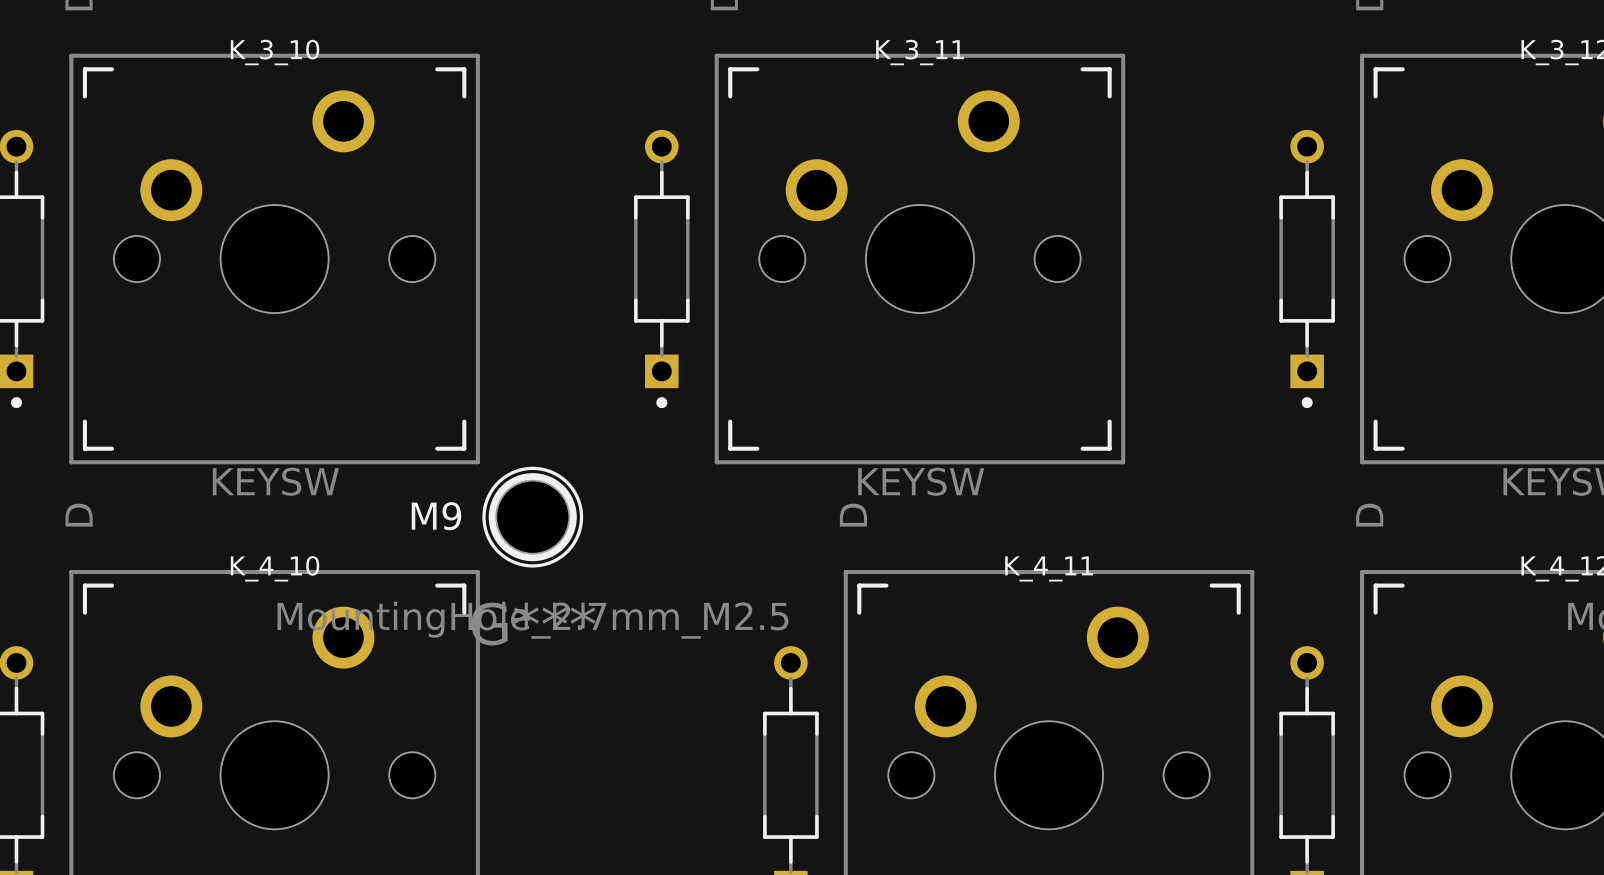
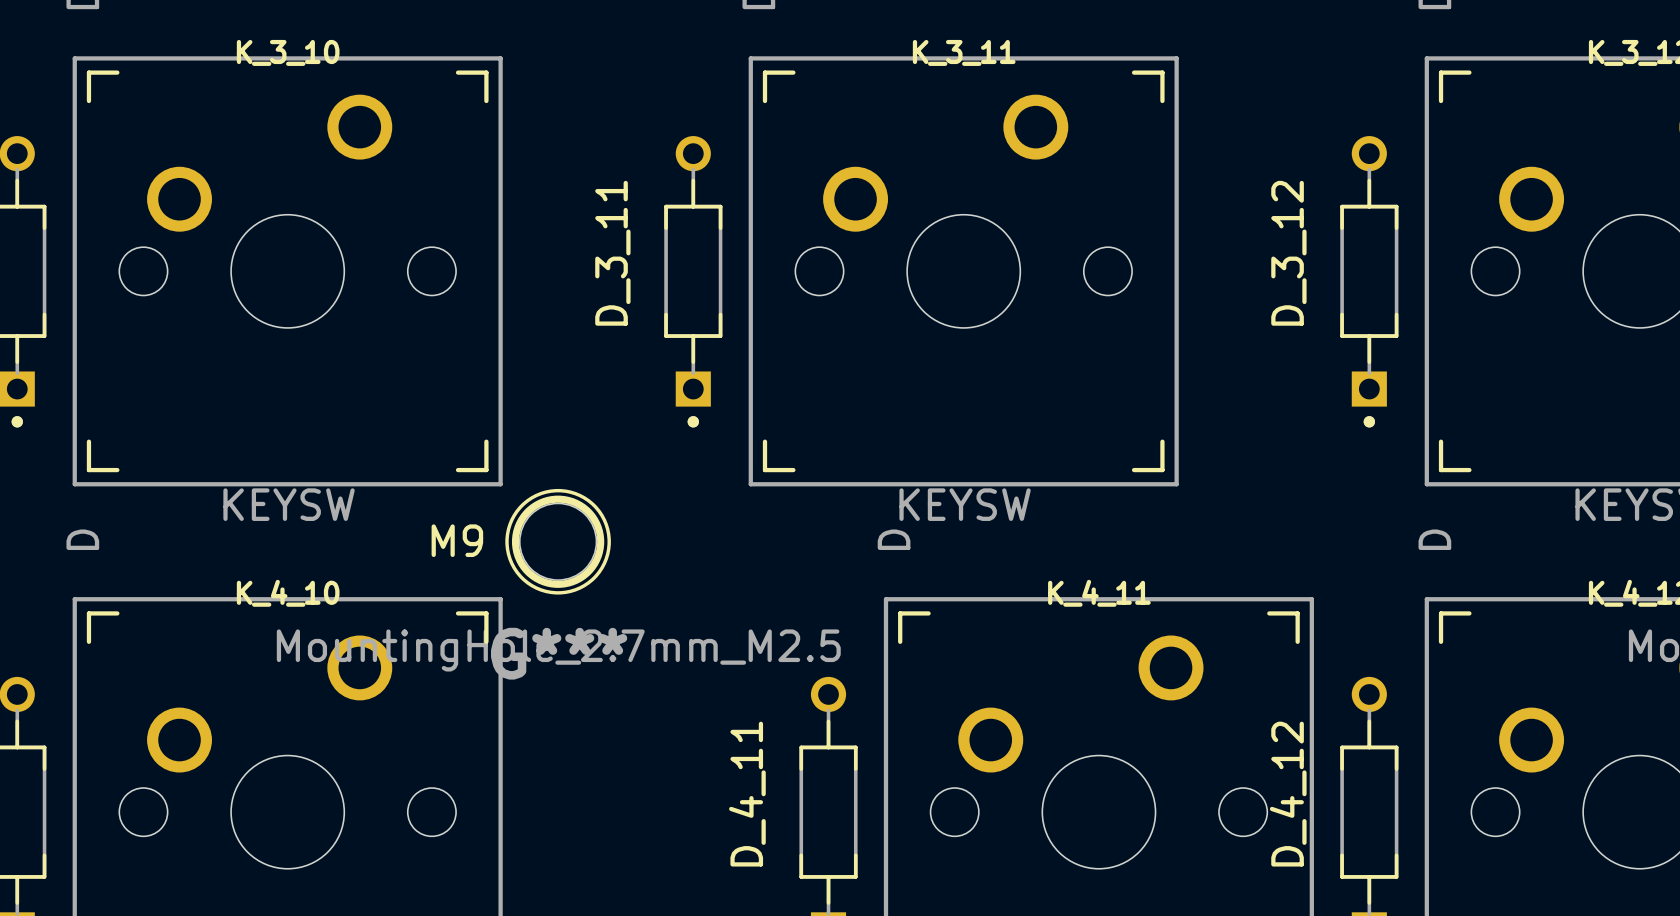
D_3_11 name: none -> D_3_11 (612, 253)
D_3_12 name: none -> D_3_12 (1288, 253)
D_4_11 name: none -> D_4_11 (747, 794)
D_4_12 name: none -> D_4_12 (1288, 794)

